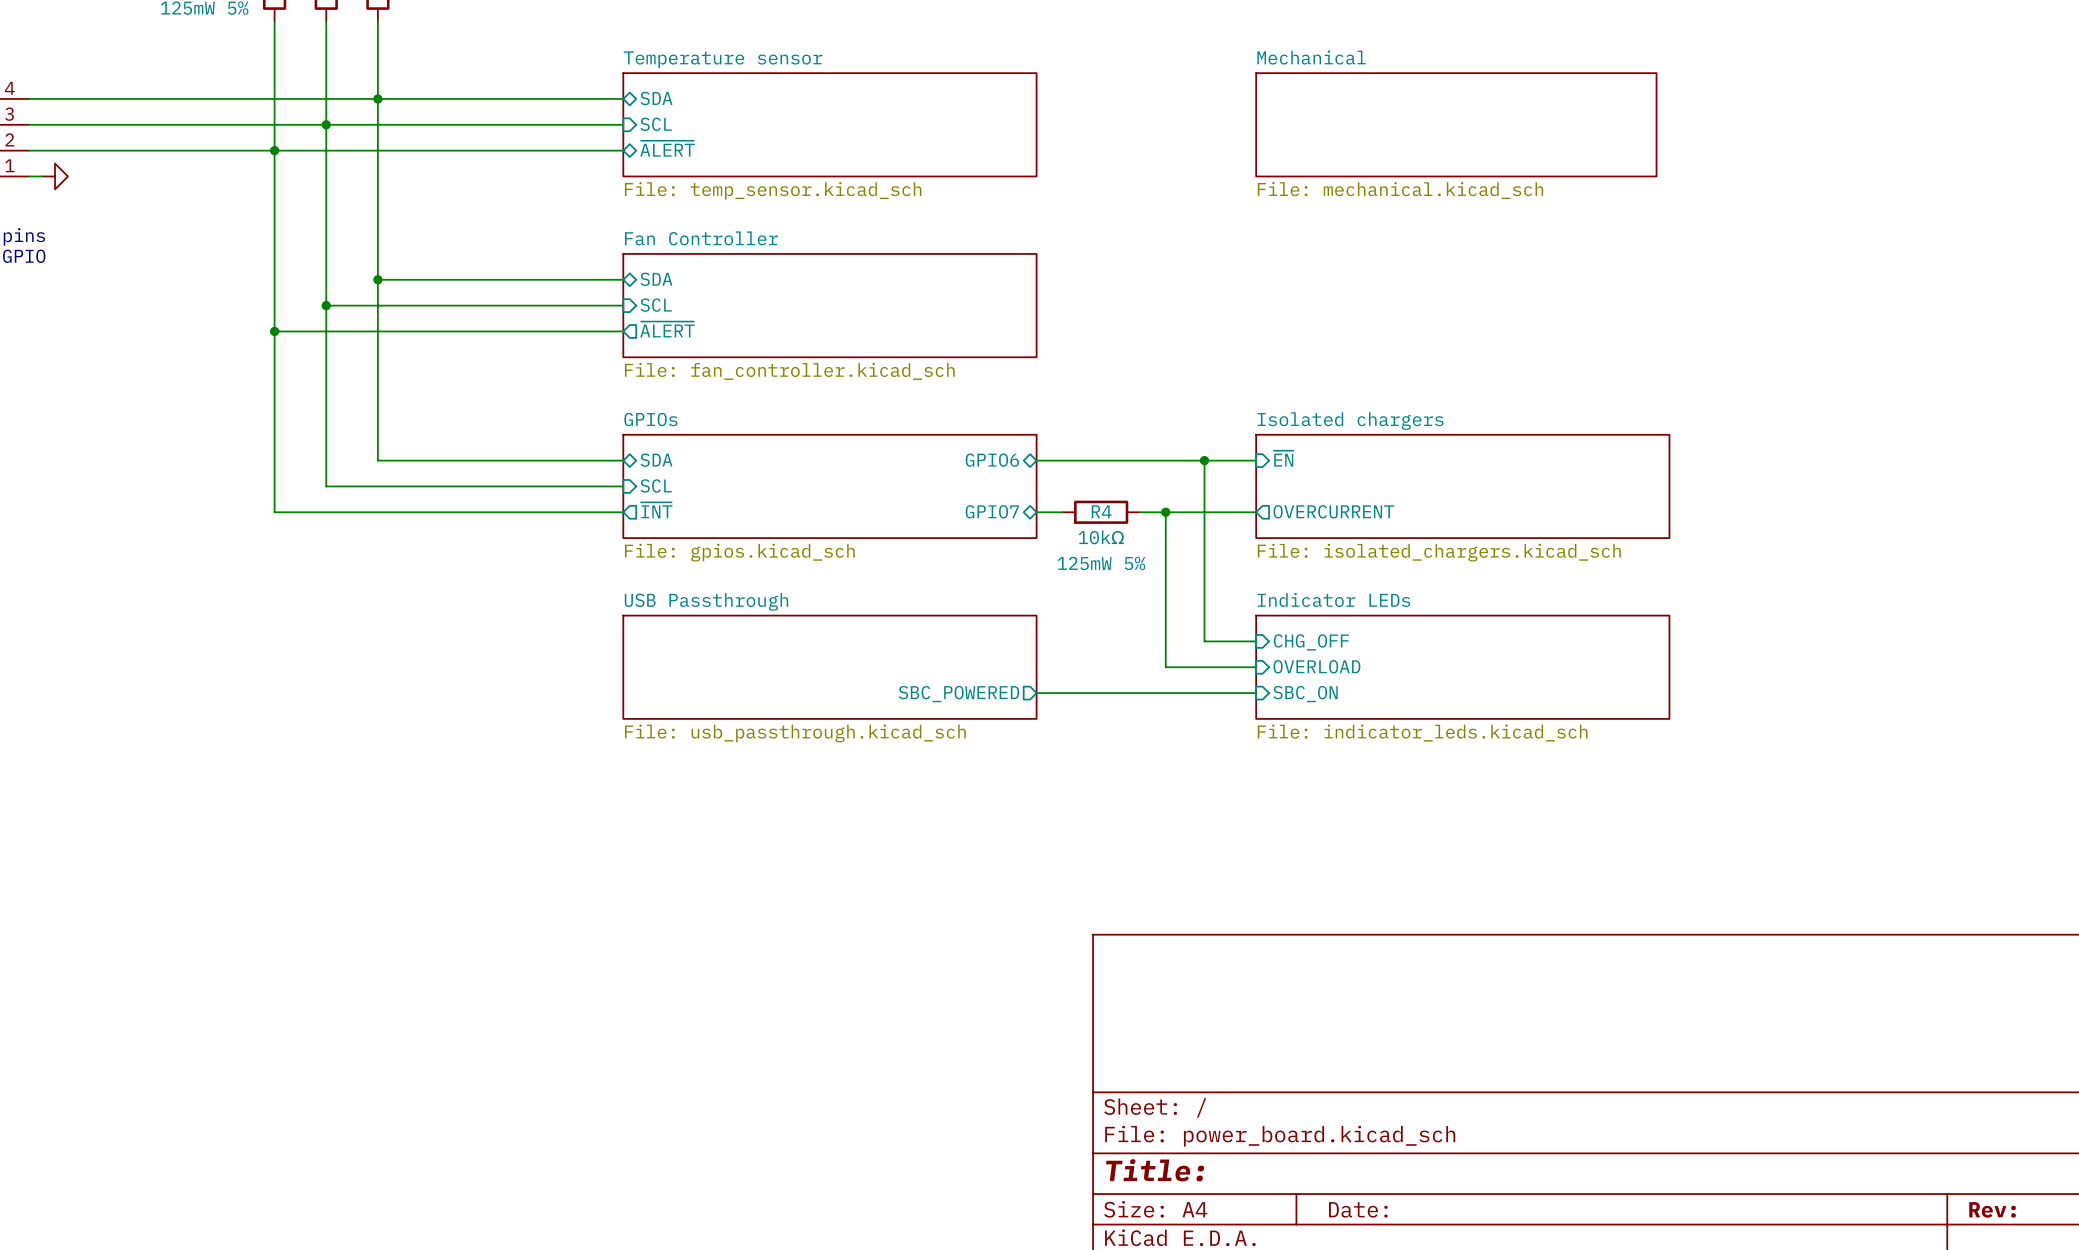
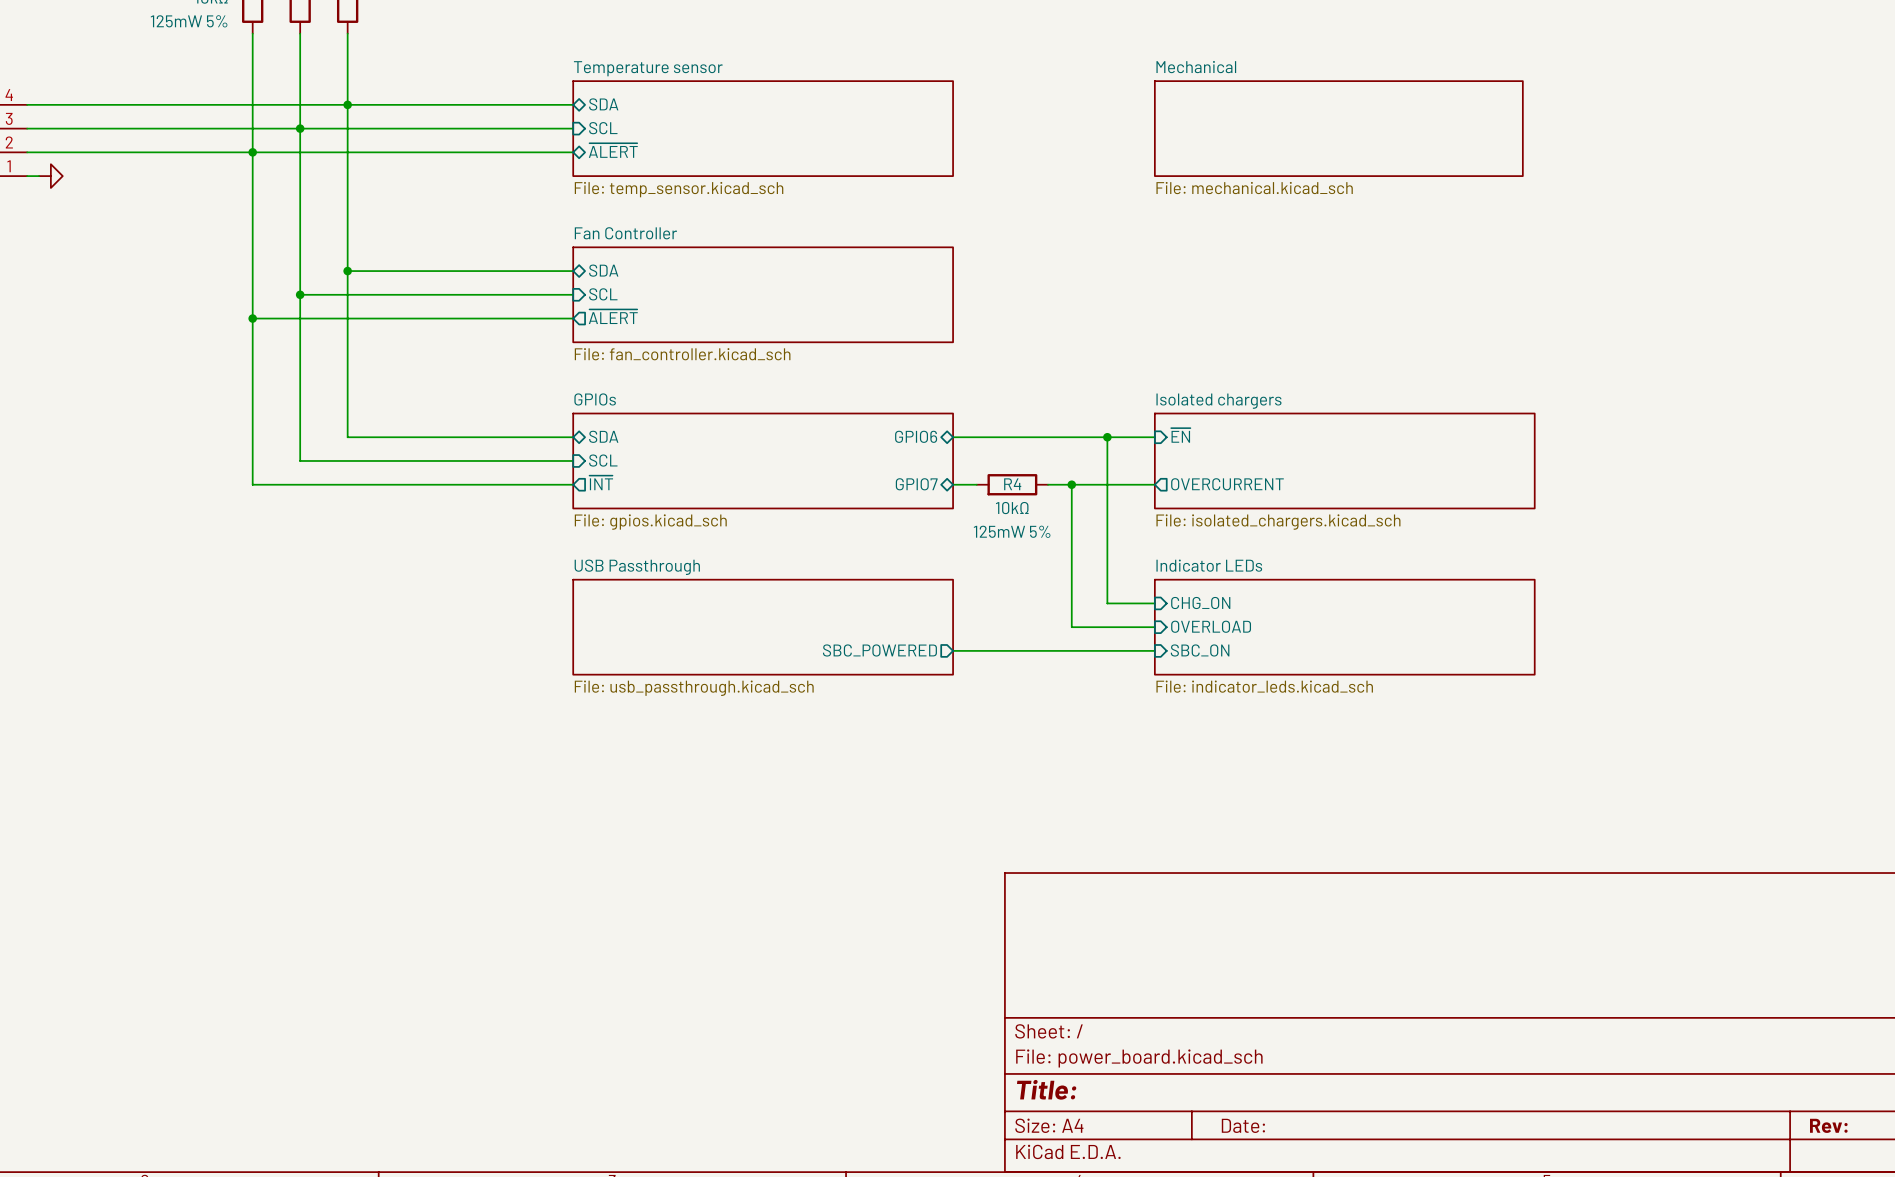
sheet pin: CHG_OFF (1311, 642) -> CHG_ON (1200, 603)

